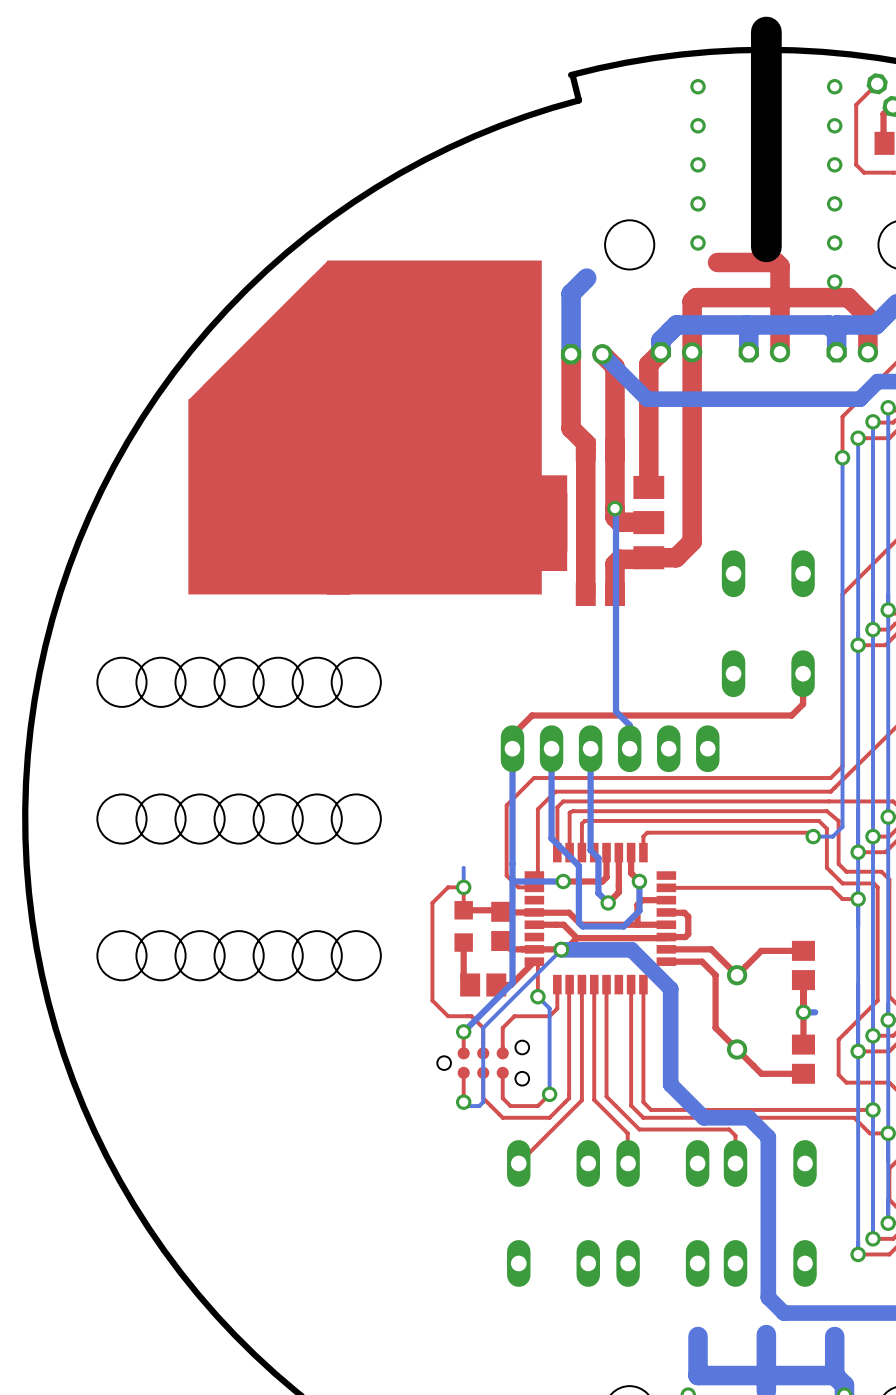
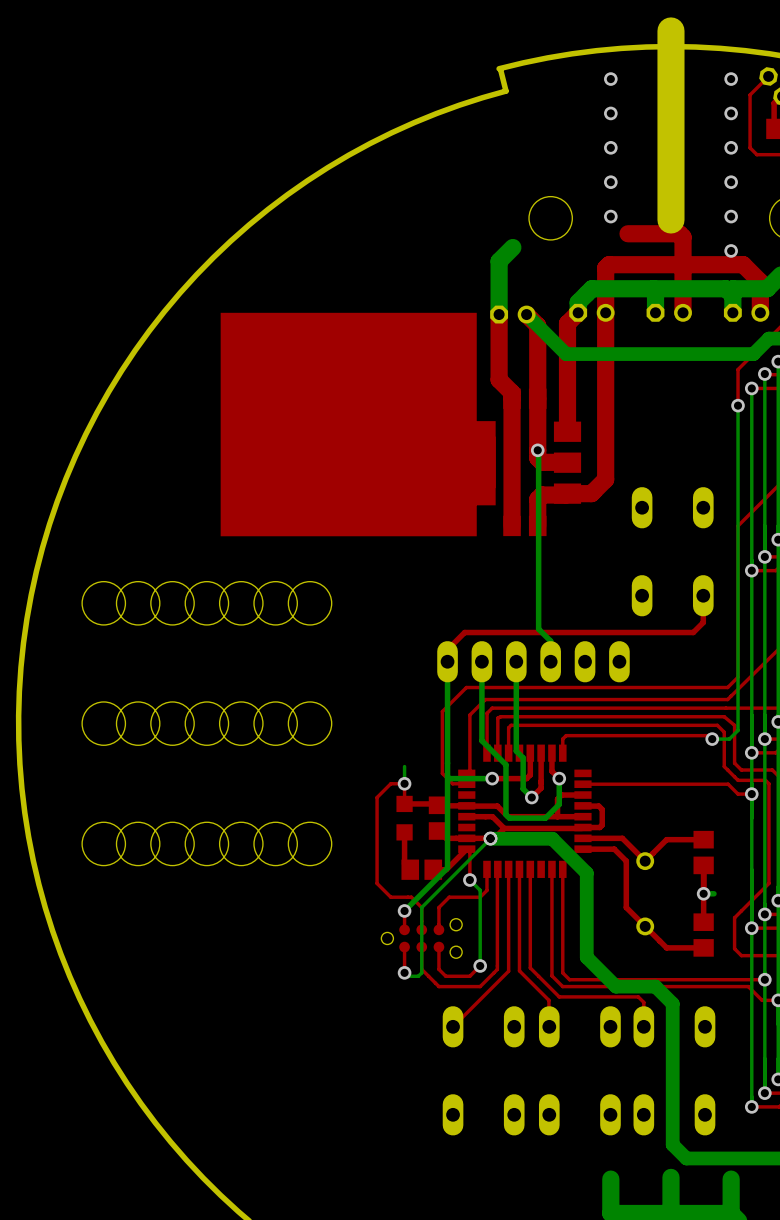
drawing: [188, 260, 542, 595] -> none
drawing: none -> [220, 312, 477, 537]

